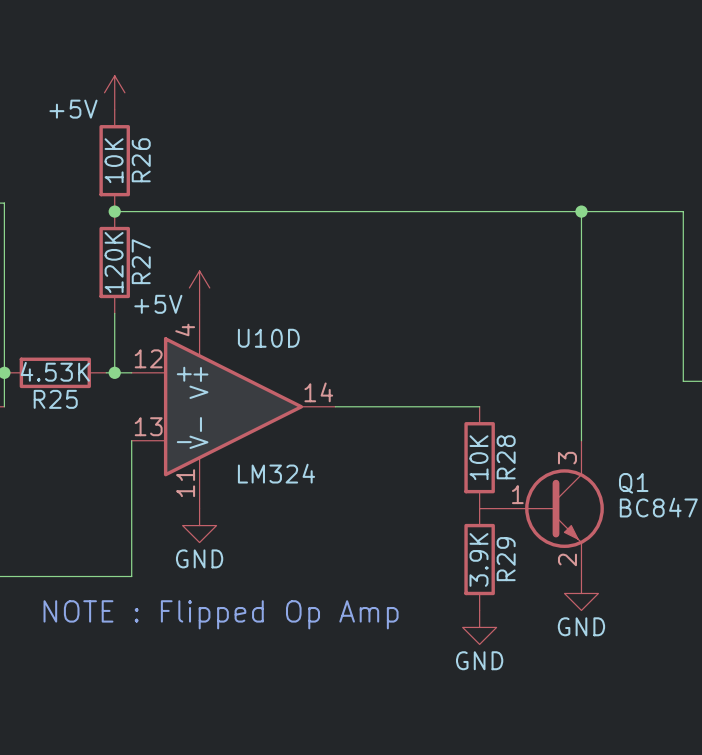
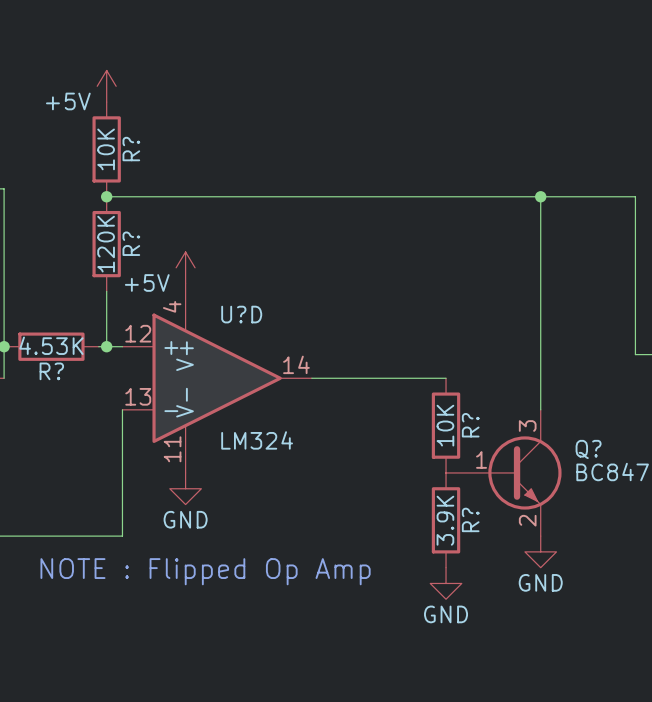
R26 name: R26 (141, 160) -> R? (131, 149)
R27 name: R27 (141, 261) -> R? (131, 243)
U10D name: U10D (268, 338) -> U?D (241, 314)
R25 name: R25 (55, 399) -> R? (51, 371)
R28 name: R28 (506, 457) -> R? (470, 425)
Q1 name: Q1 (633, 483) -> Q? (588, 449)
R29 name: R29 (506, 559) -> R? (470, 519)

